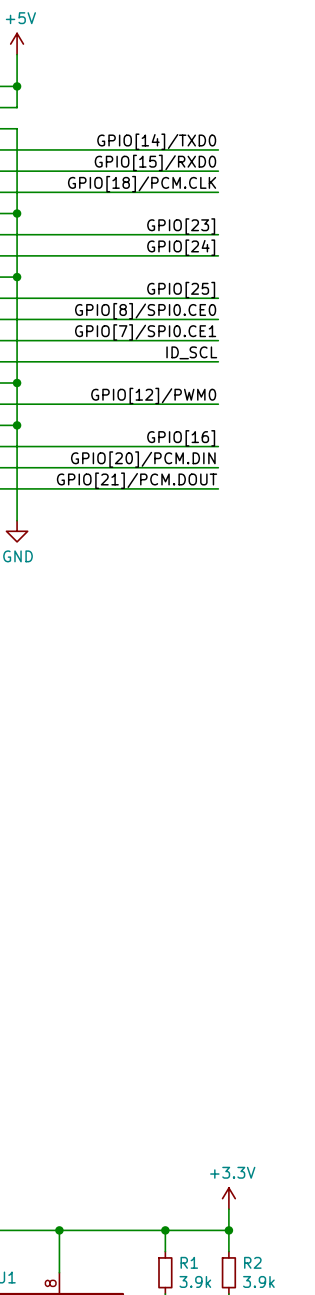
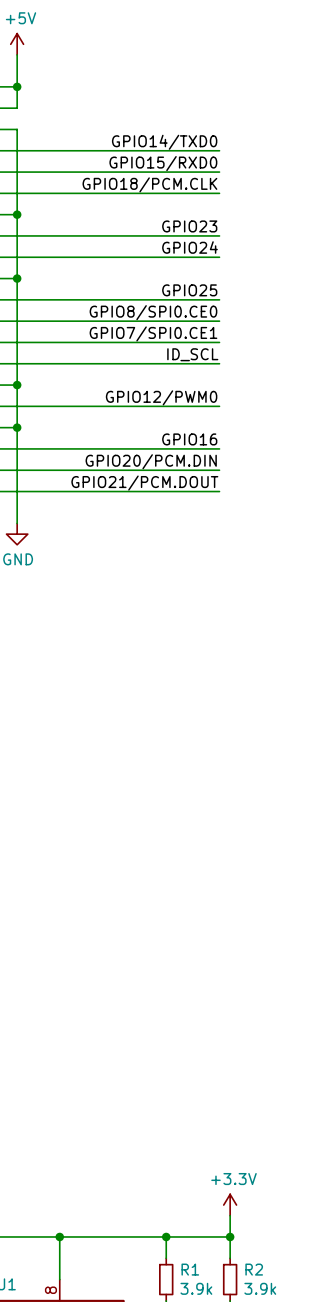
label: GPIO[14]/TXD0 (156, 141) -> GPIO14/TXD0 (164, 142)
label: GPIO[15]/RXD0 (155, 162) -> GPIO15/RXD0 (163, 163)
label: GPIO[18]/PCM.CLK (142, 184) -> GPIO18/PCM.CLK (149, 184)
label: GPIO[23] (181, 226) -> GPIO23 (189, 226)
label: GPIO[24] (181, 247) -> GPIO24 (189, 247)
label: GPIO[25] (181, 290) -> GPIO25 (189, 290)
label: GPIO[8]/SPI0.CE0 (145, 311) -> GPIO8/SPI0.CE0 (153, 312)
label: GPIO[7]/SPI0.CE1 (145, 332) -> GPIO7/SPI0.CE1 (153, 333)
label: GPIO[12]/PWM0 (153, 395) -> GPIO12/PWM0 (161, 397)
label: GPIO[16] (181, 438) -> GPIO16 (189, 439)
label: GPIO[20]/PCM.DIN (143, 459) -> GPIO20/PCM.DIN (151, 461)
label: GPIO[21]/PCM.DOUT (137, 480) -> GPIO21/PCM.DOUT (144, 483)

